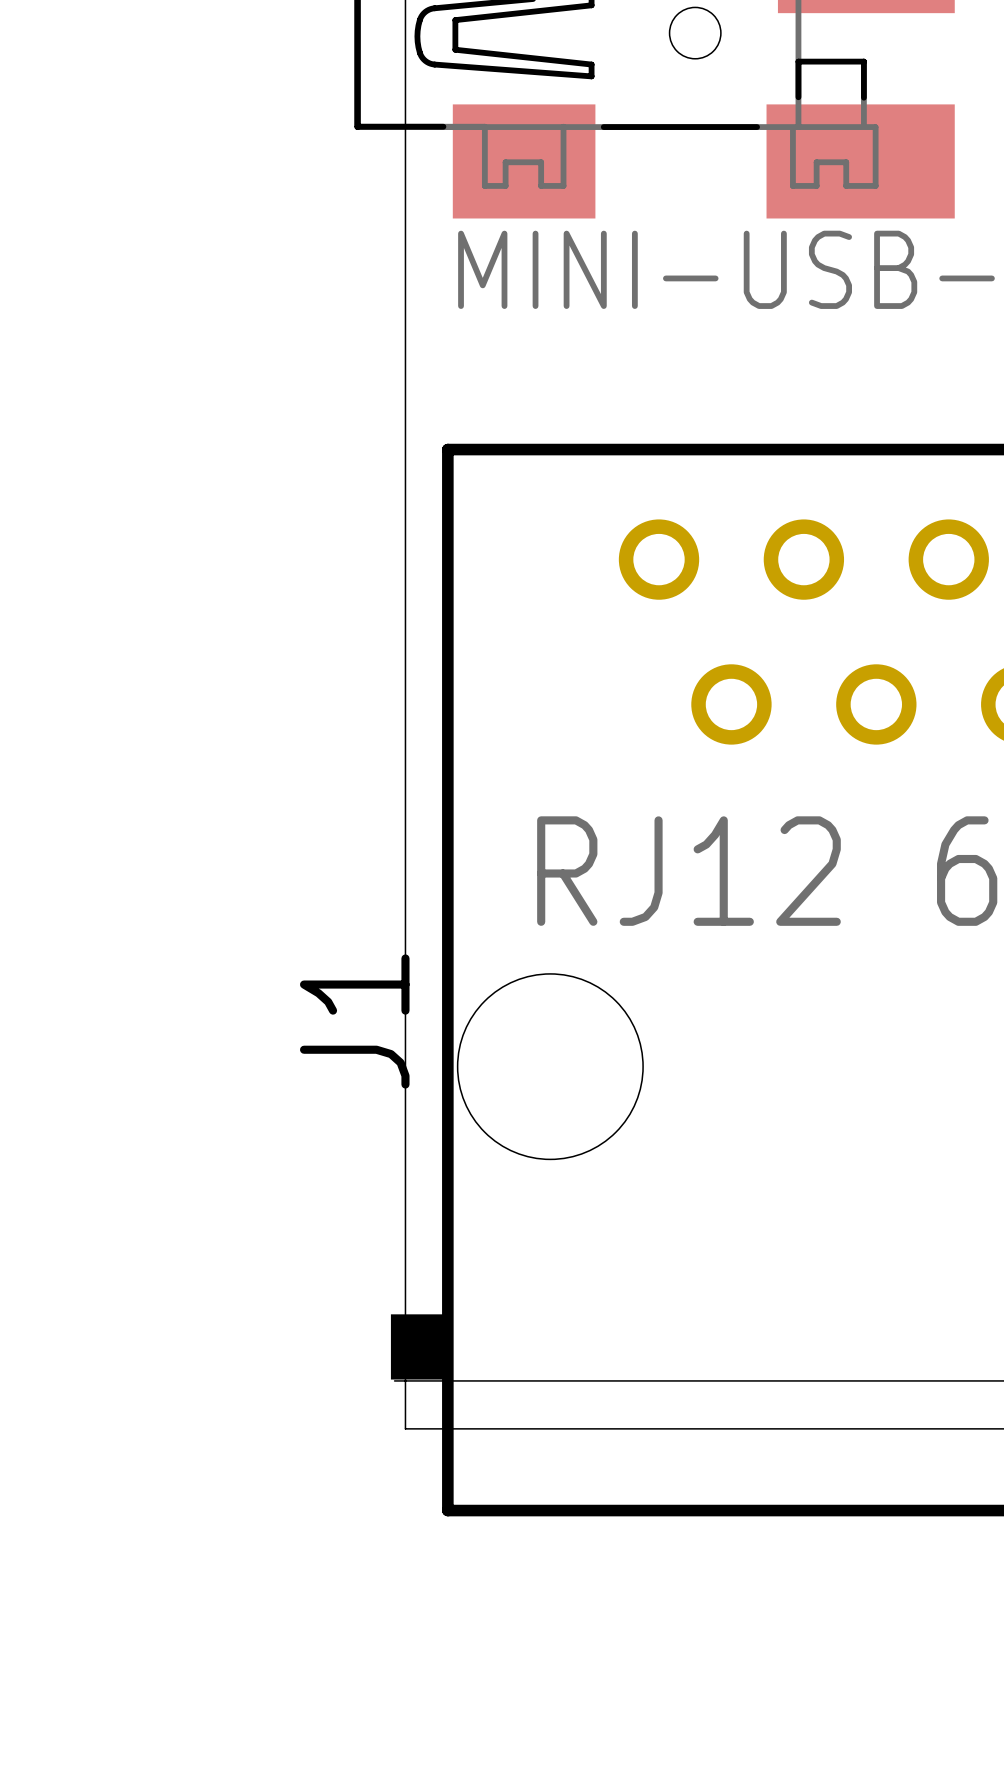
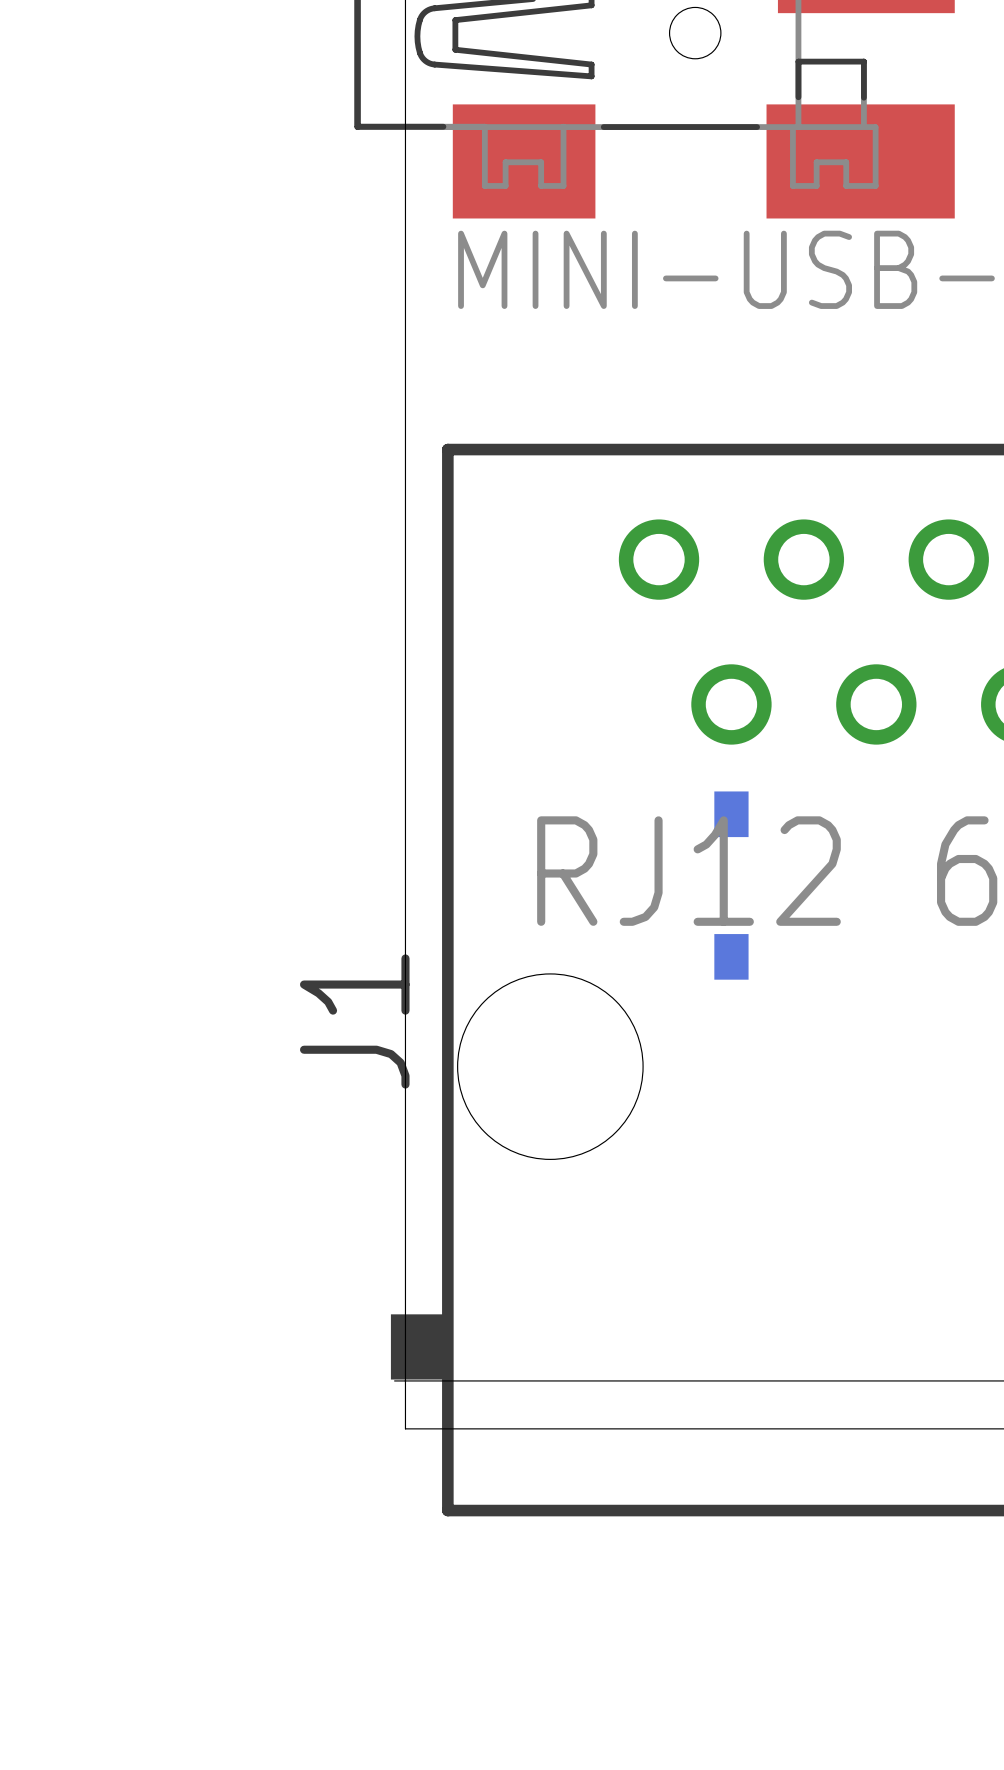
part: none -> (731, 885)

